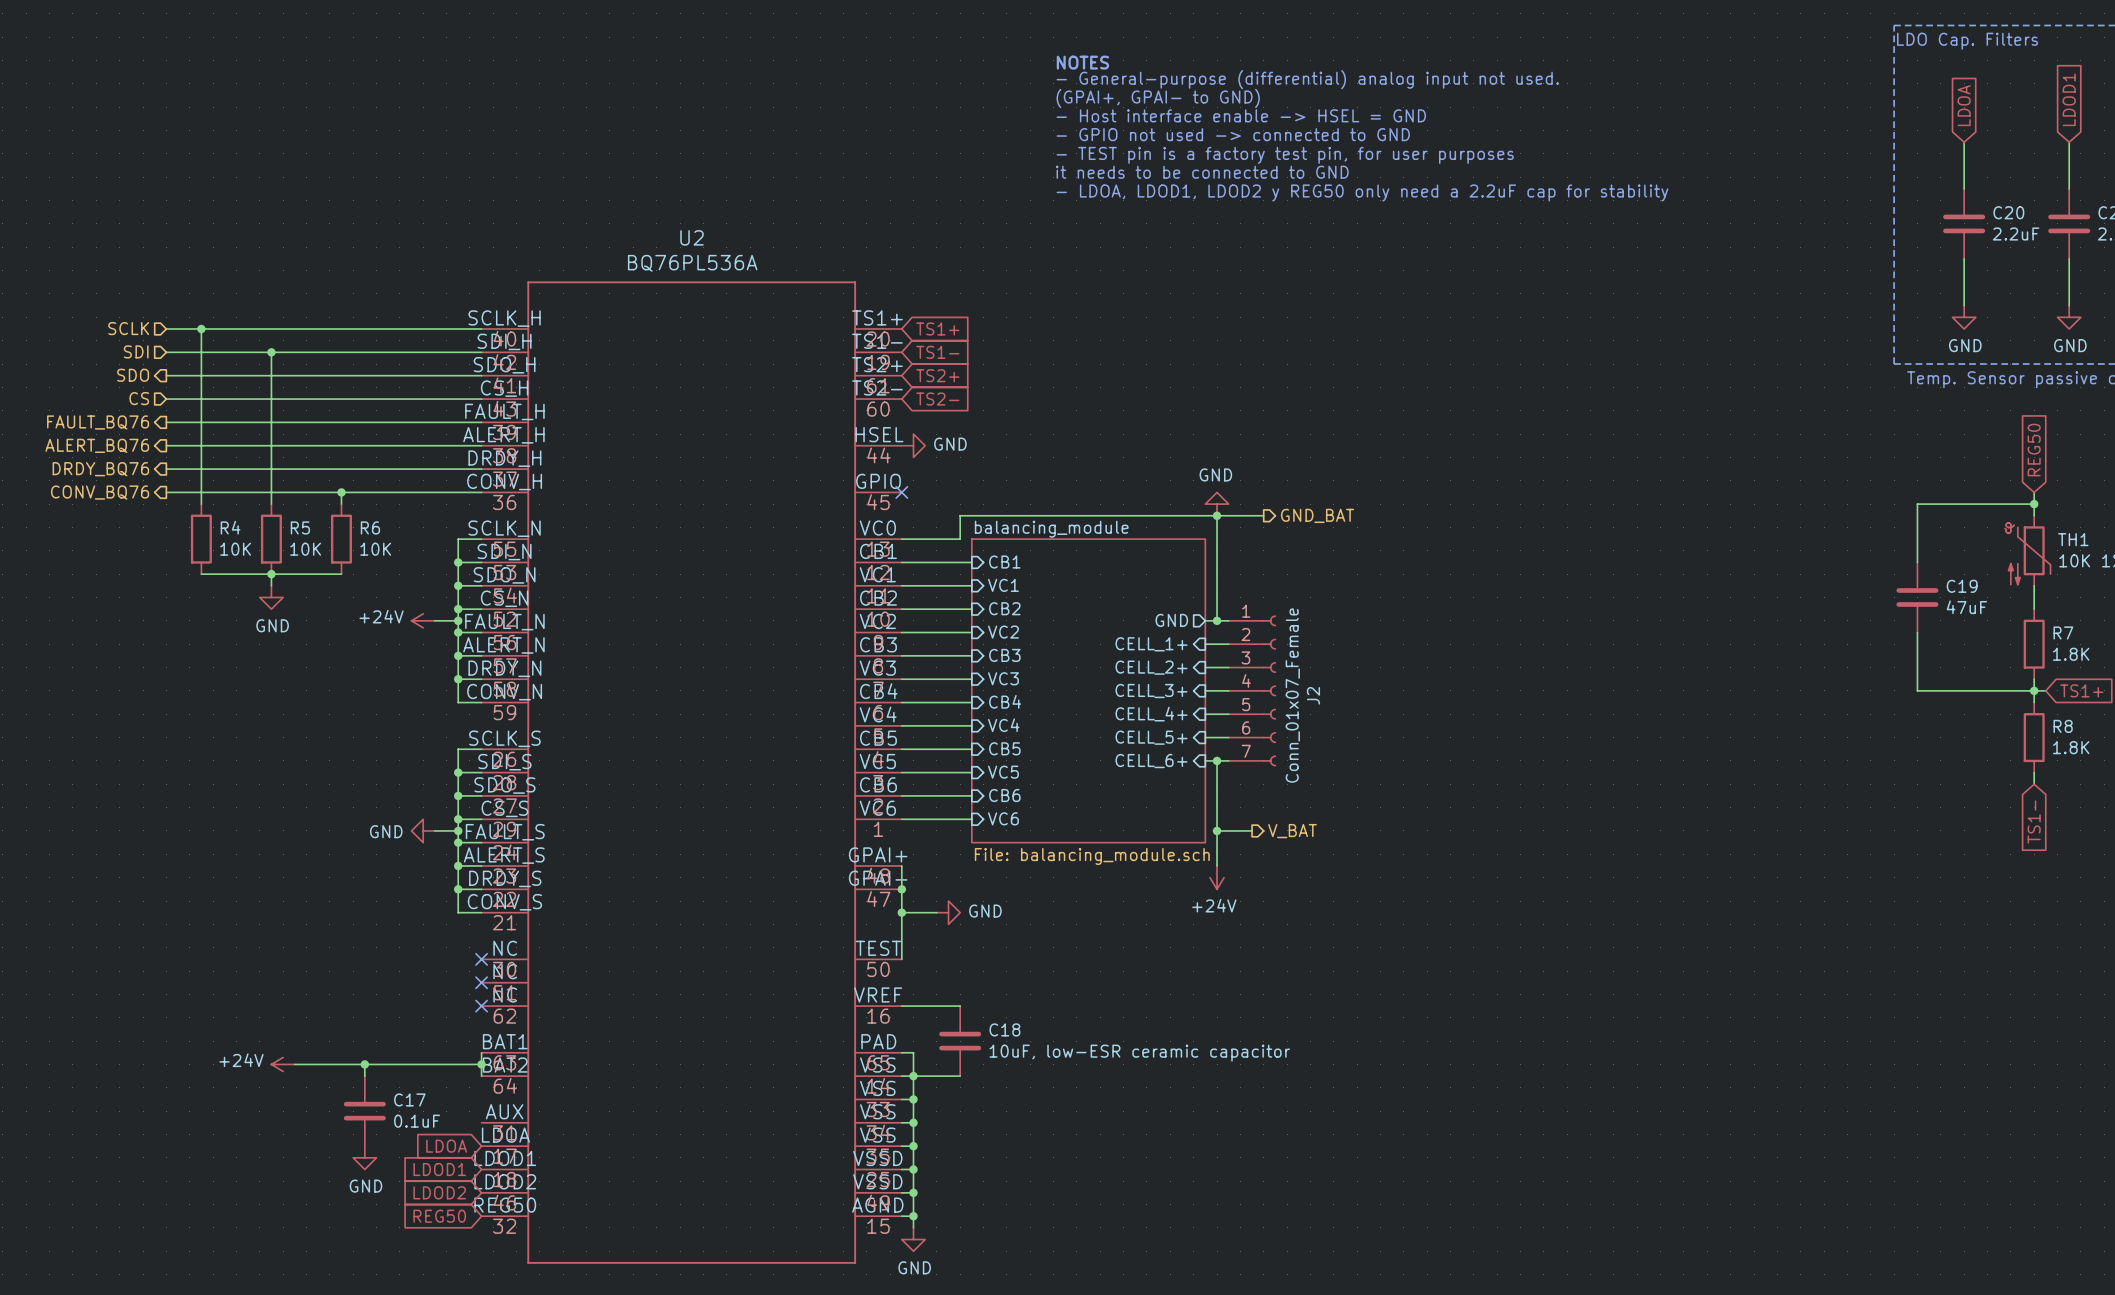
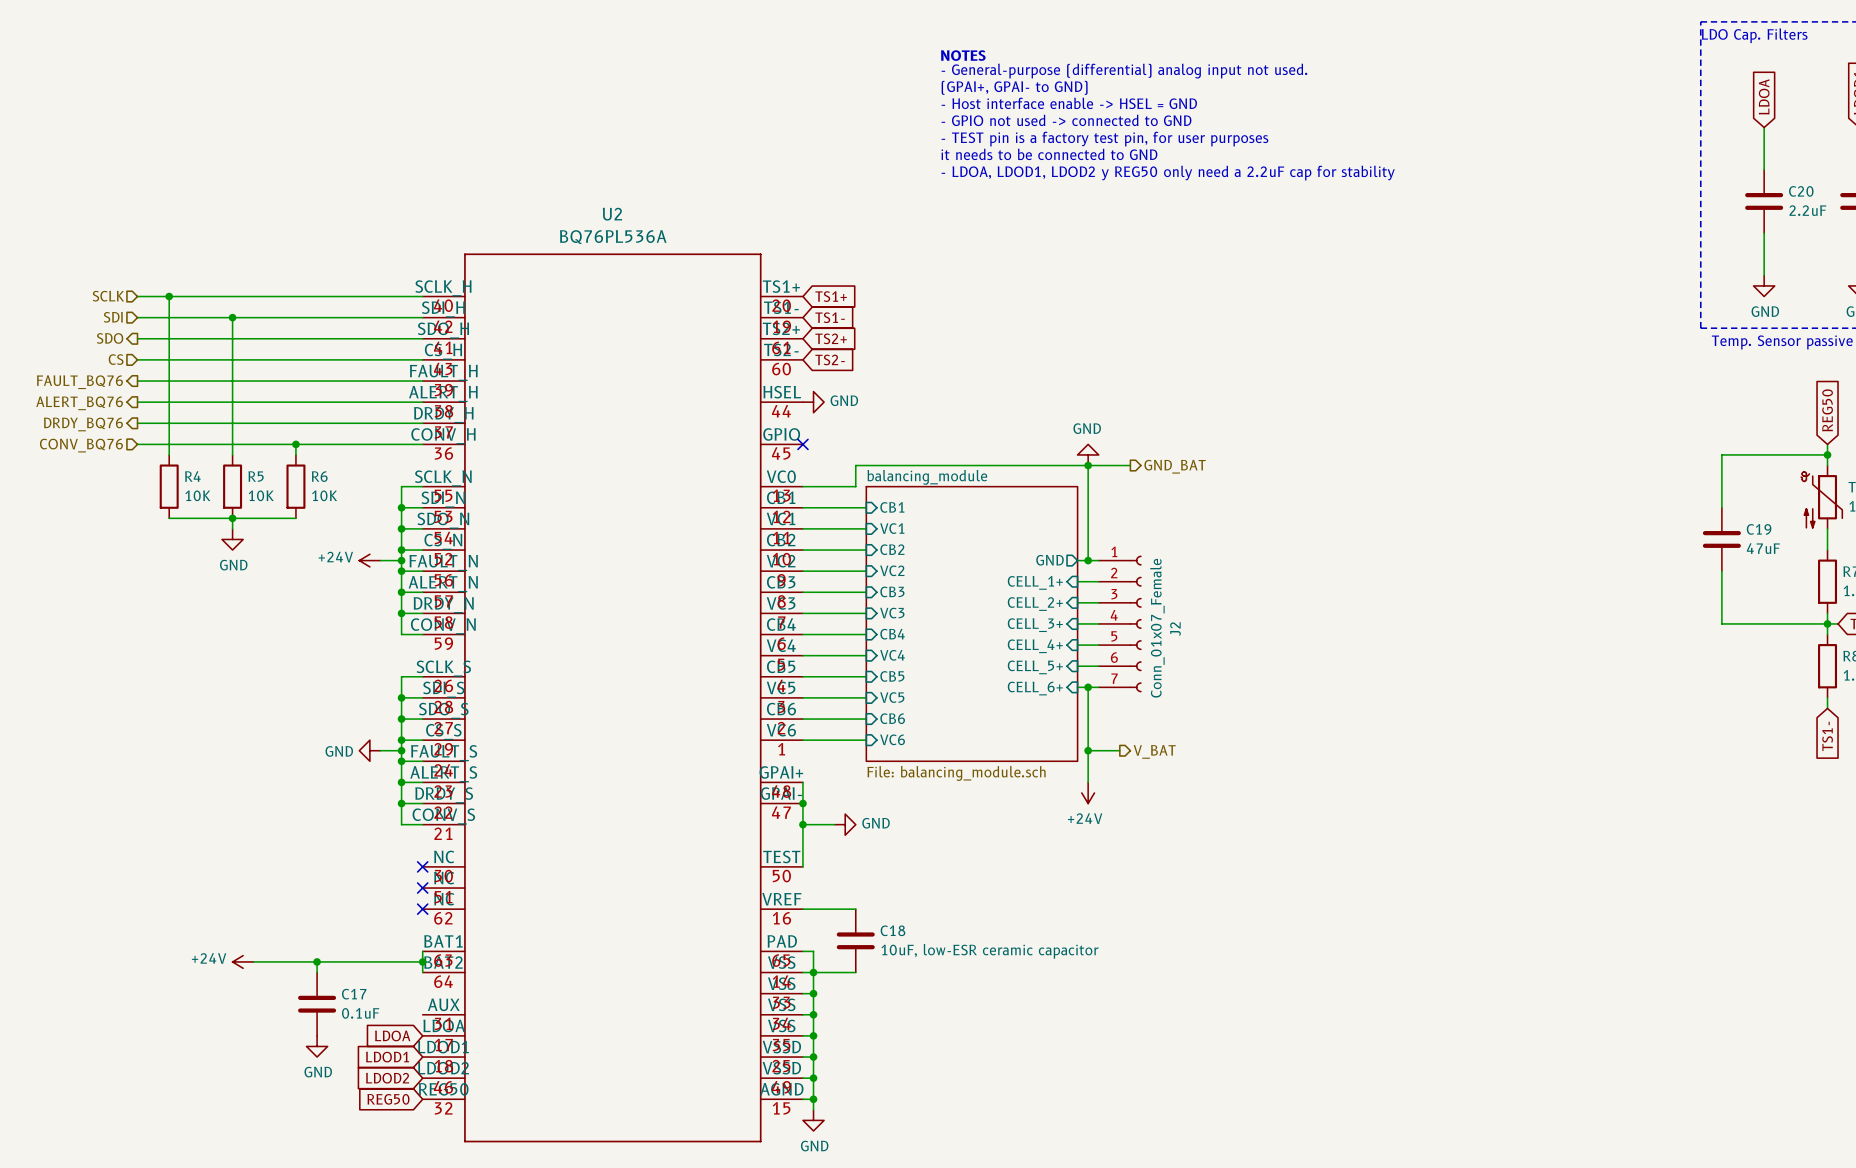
hierarchical label shape: output (100, 492) -> input (81, 445)

